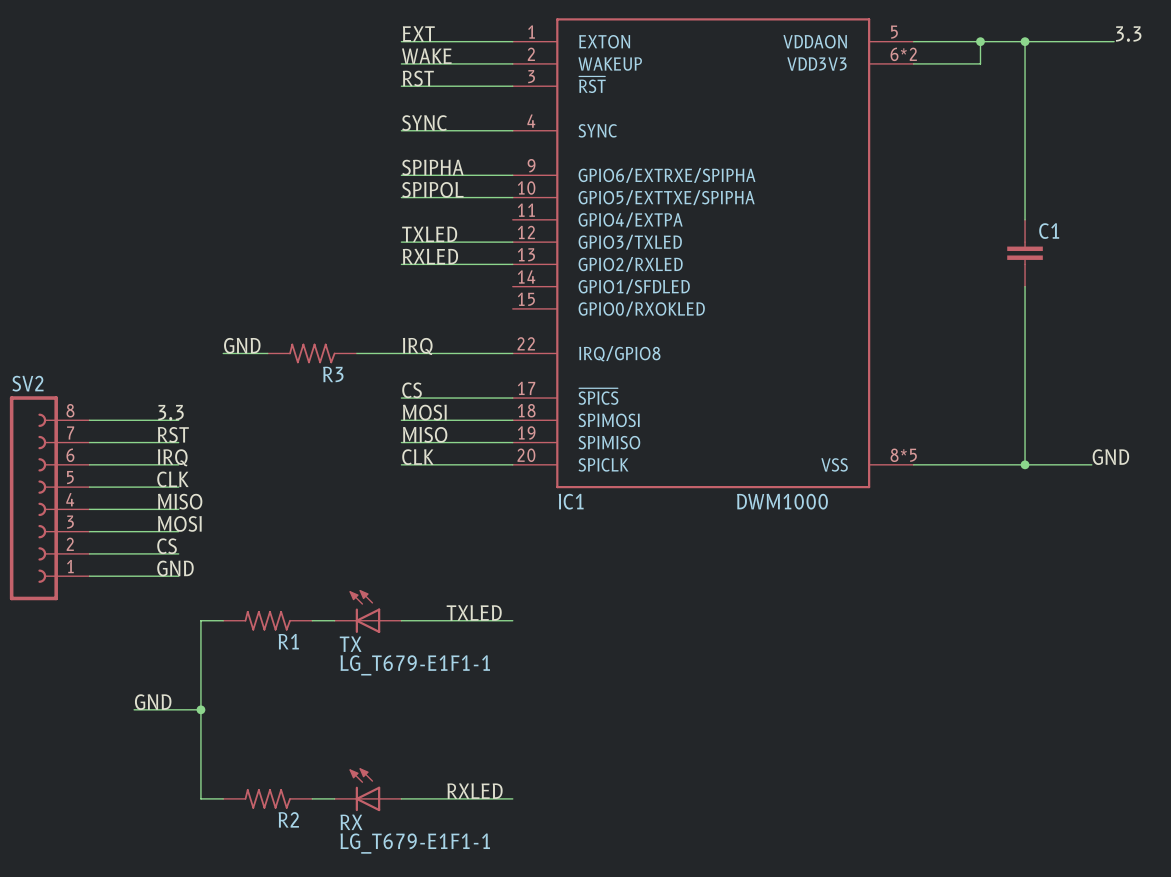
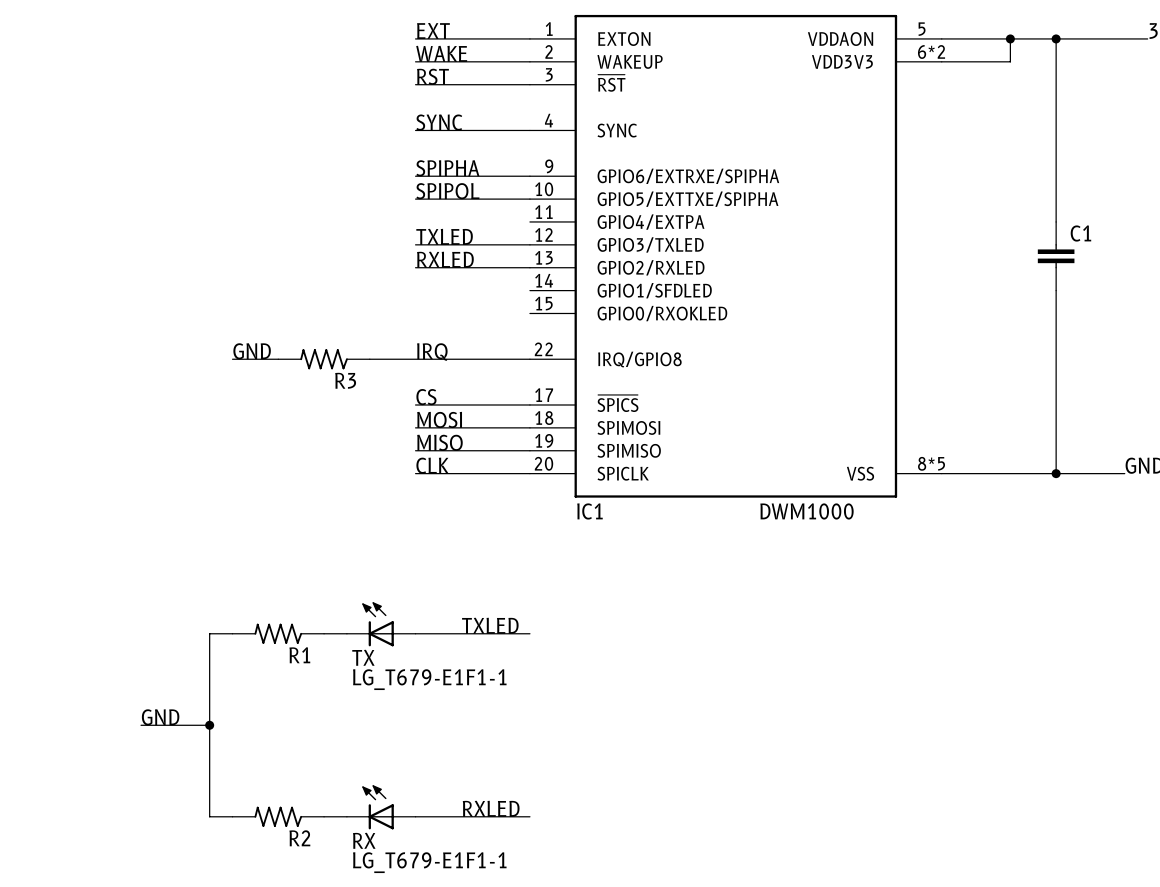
label: 3.3 (170, 412) -> none
wire: (89, 420) (178, 420) -> none
label: RST (173, 434) -> none
wire: (89, 442) (178, 442) -> none
label: IRQ (172, 457) -> none
wire: (89, 464) (178, 464) -> none
label: CLK (172, 479) -> none
wire: (89, 487) (178, 487) -> none
SV2: (49, 498) -> none
label: MISO (180, 501) -> none
wire: (89, 509) (178, 509) -> none
label: MOSI (179, 523) -> none
wire: (89, 531) (178, 531) -> none
label: CS (167, 546) -> none
wire: (89, 553) (178, 553) -> none
label: GND (175, 568) -> none
wire: (89, 576) (178, 576) -> none

